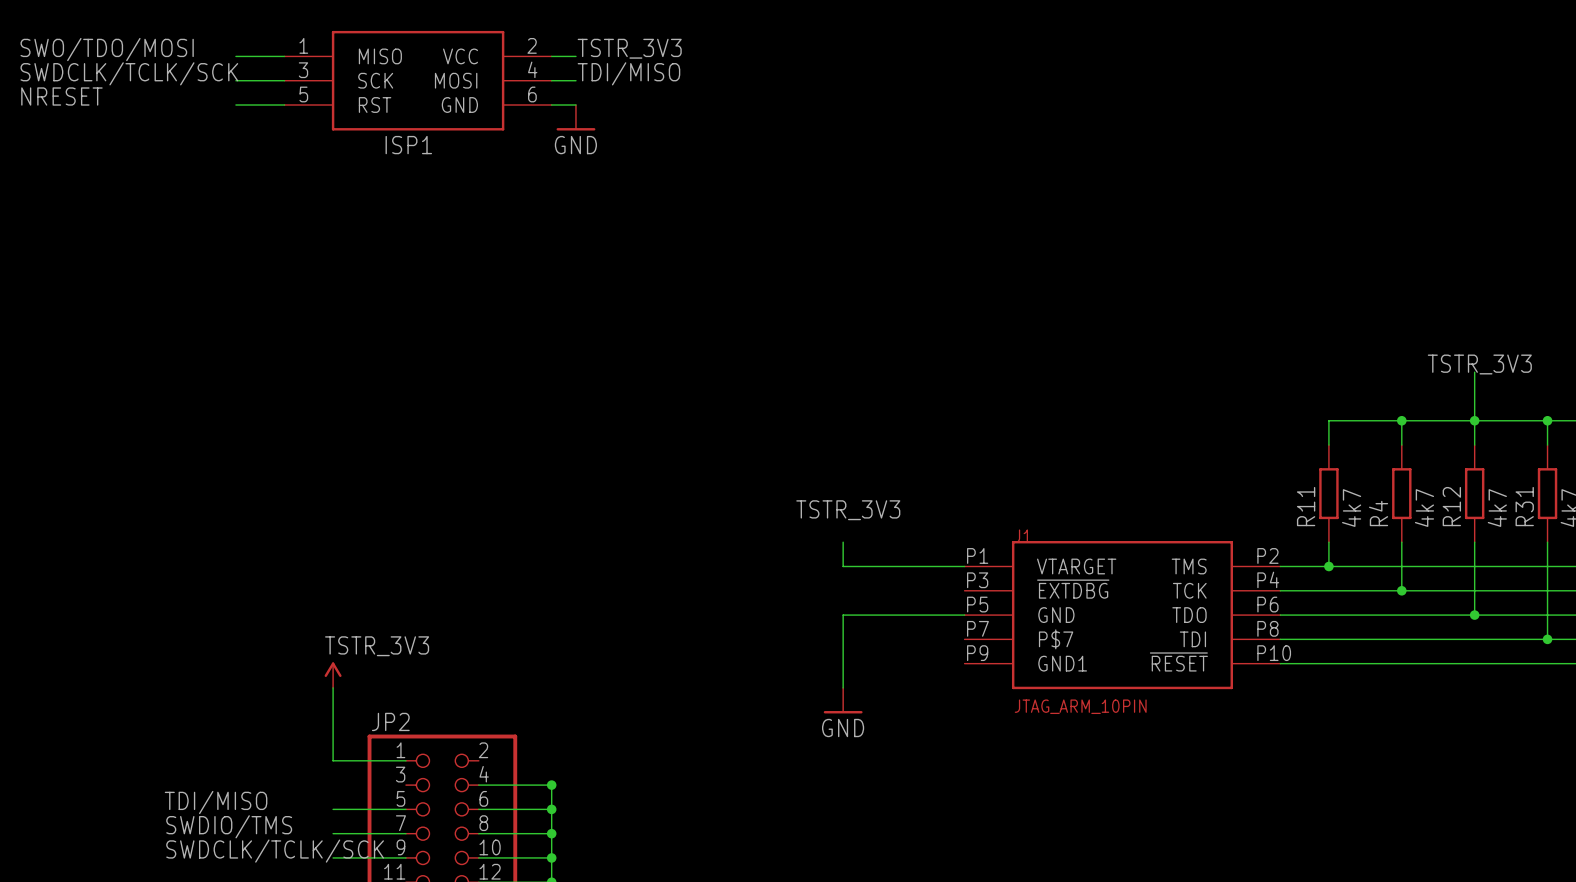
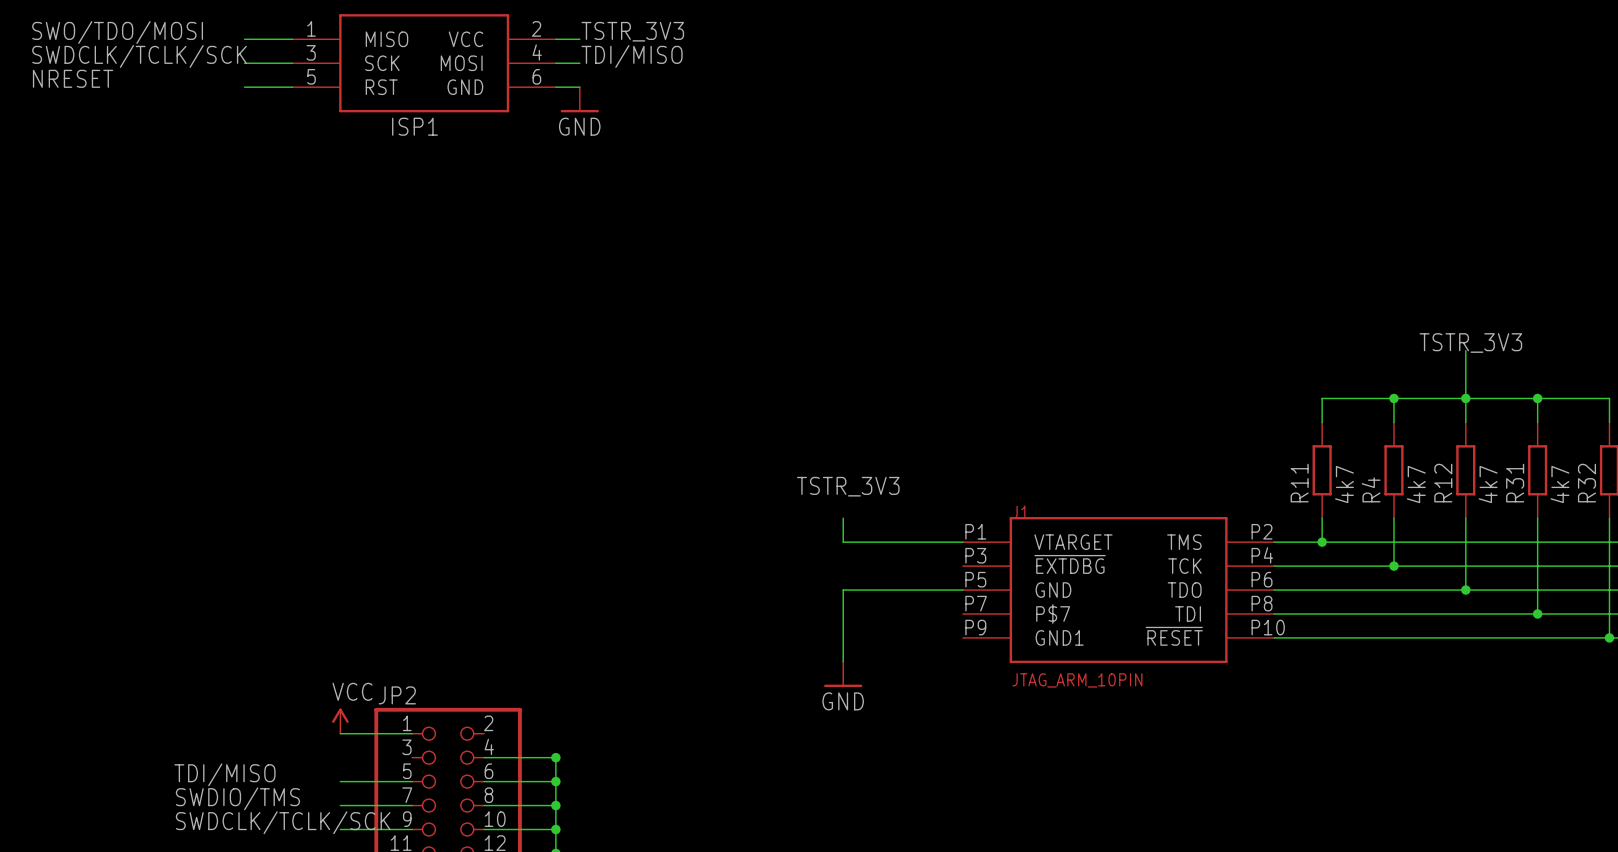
power symbol: TSTR_3V3 (333, 675) -> none
wire: (333, 687) (333, 760) -> none
power symbol: none -> VCC (340, 721)

